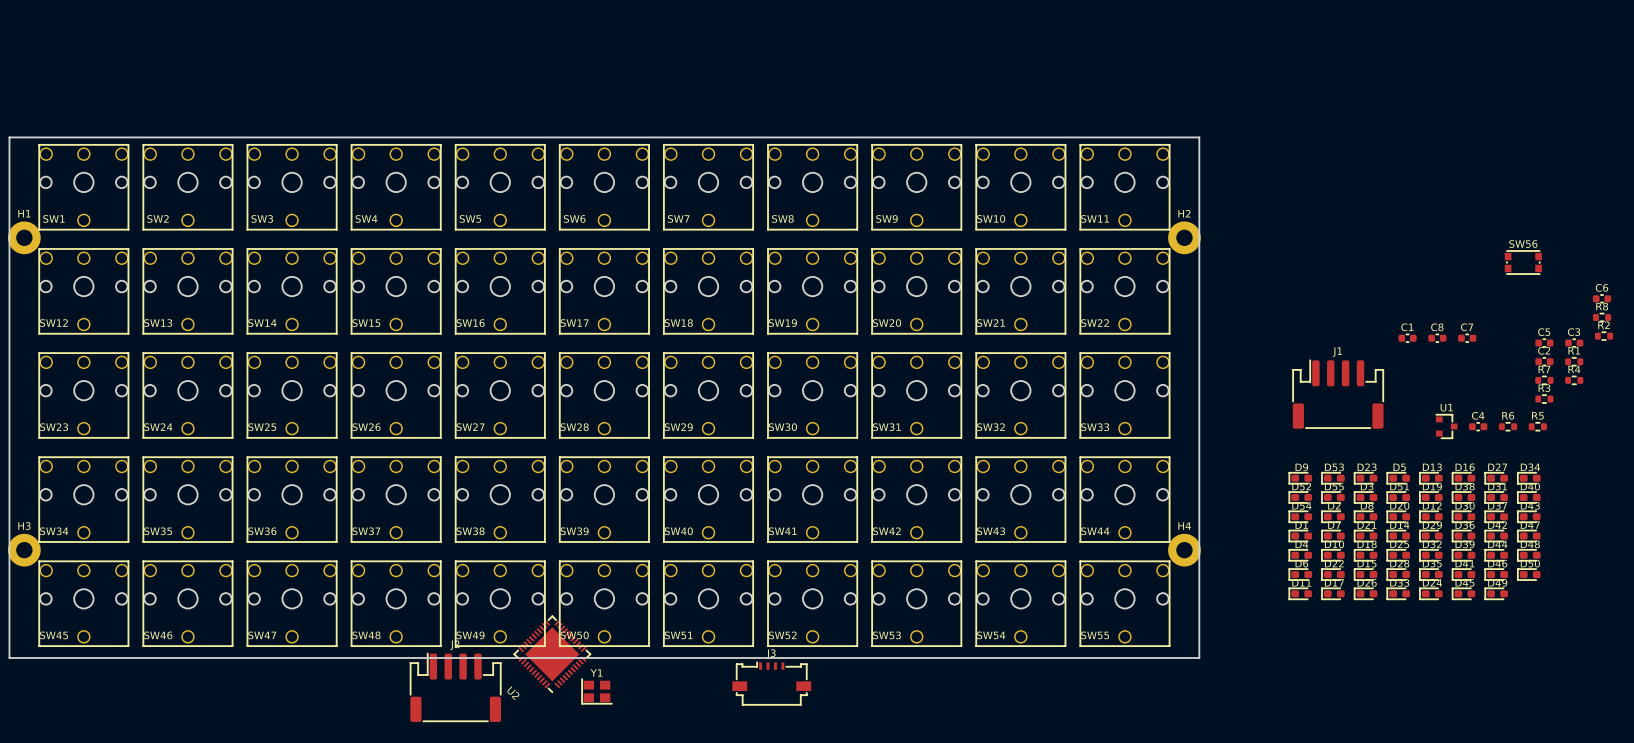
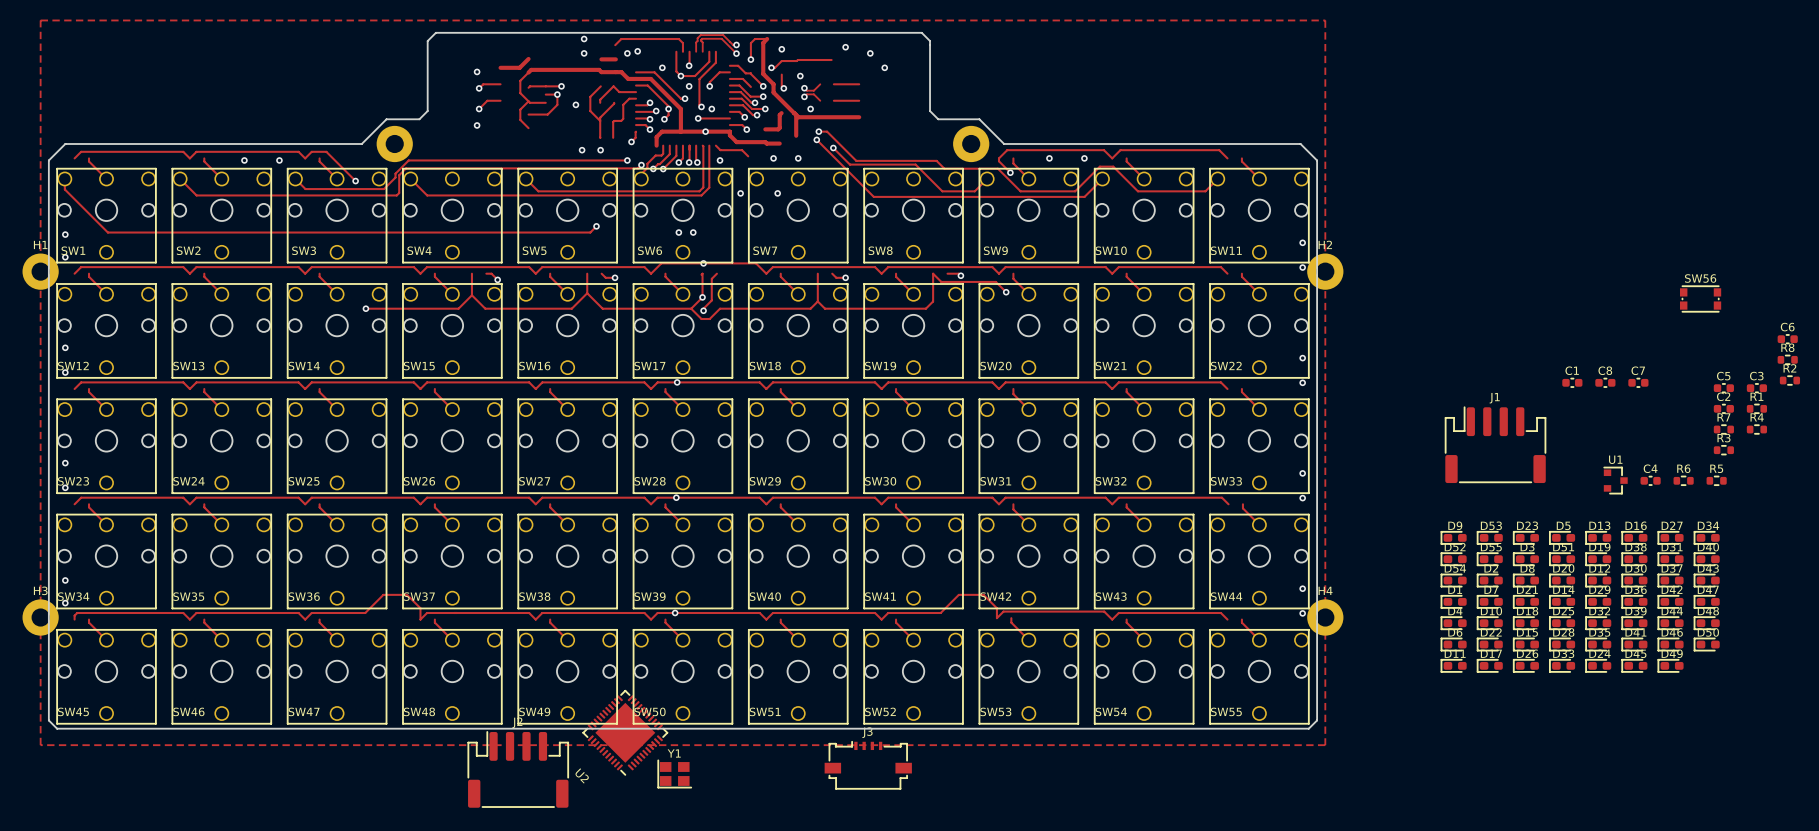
zone outline: none -> (40, 20) (40, 745) (1325, 745) (1325, 20) (40, 20)
via: none -> (584, 39)
track: none -> (615, 45) (621, 39) (678, 39) (682, 43) (682, 51)
track: none -> (736, 44) (733, 44) (723, 35) (700, 35) (696, 42) (696, 51)
via: none -> (736, 44)
via: none -> (845, 47)
via: none -> (781, 49)
via: none -> (637, 51)
track: none -> (676, 51) (676, 71) (680, 76) (694, 76) (709, 61) (709, 51)
track: none -> (689, 51) (689, 65)
track: none -> (702, 51) (702, 38) (721, 38) (736, 53)
track: none -> (715, 51) (715, 62) (699, 79) (699, 104) (701, 106)
via: none -> (584, 53)
via: none -> (627, 53)
via: none -> (736, 53)
via: none -> (870, 53)
track: none -> (528, 58) (519, 67) (500, 67)
track: none -> (601, 59) (615, 59)
track: none -> (750, 59) (750, 43) (755, 39) (767, 39) (763, 42) (763, 73) (773, 84) (773, 92) (798, 117) (859, 117)
via: none -> (750, 59)
track: none -> (831, 60) (781, 61) (775, 67) (771, 67)
via: none -> (689, 65)
track: none -> (729, 65) (738, 65) (745, 73) (750, 73) (763, 86)
via: none -> (662, 67)
via: none -> (771, 67)
via: none -> (884, 67)
via: none -> (477, 71)
track: none -> (636, 72) (654, 72) (680, 98) (685, 98)
track: none -> (729, 72) (719, 72) (709, 82) (709, 86)
track: none -> (781, 74) (781, 86) (783, 88)
via: none -> (680, 76)
via: none -> (800, 76)
track: none -> (729, 78) (742, 78) (750, 86)
track: none -> (500, 84) (483, 84) (479, 88)
track: none -> (820, 84) (813, 90) (806, 90) (804, 88)
track: none -> (833, 84) (859, 84)
track: none -> (636, 85) (647, 85) (668, 106) (668, 115) (664, 119)
track: none -> (729, 85) (739, 85) (750, 96) (763, 96)
track: none -> (561, 86) (528, 87)
via: none -> (561, 86)
track: none -> (600, 86) (590, 96) (590, 111) (600, 120)
via: none -> (689, 86)
via: none -> (709, 86)
via: none -> (763, 86)
via: none -> (479, 88)
via: none -> (783, 88)
via: none -> (804, 88)
track: none -> (636, 92) (619, 92) (613, 86) (600, 99) (600, 102)
track: none -> (729, 92) (740, 92) (751, 102) (755, 102)
track: none -> (545, 94) (557, 94) (557, 104) (547, 114) (528, 114)
via: none -> (557, 94)
via: none -> (763, 96)
track: none -> (804, 96) (806, 94) (813, 94) (820, 100)
via: none -> (804, 96)
track: none -> (636, 98) (629, 98) (623, 104) (623, 118) (613, 121) (613, 137)
via: none -> (685, 98)
track: none -> (729, 98) (741, 98) (752, 108) (765, 108)
track: none -> (500, 100) (487, 100) (479, 108)
track: none -> (833, 100) (859, 100)
track: none -> (528, 101) (520, 109) (520, 119) (528, 128)
track: none -> (545, 102) (530, 102) (520, 93) (520, 80) (531, 69) (599, 69) (601, 72) (621, 72) (628, 78) (650, 78) (680, 108) (680, 131)
track: none -> (614, 102) (600, 117) (600, 137)
track: none -> (650, 102) (647, 105) (636, 105)
via: none -> (650, 102)
via: none -> (755, 102)
via: none -> (575, 104)
track: none -> (729, 105) (743, 105) (752, 115) (757, 115)
via: none -> (701, 106)
via: none -> (479, 108)
via: none -> (668, 108)
via: none -> (711, 108)
via: none -> (765, 108)
via: none -> (810, 108)
track: none -> (656, 111) (636, 111)
via: none -> (656, 111)
track: none -> (729, 111) (739, 111) (744, 117)
track: none -> (781, 113) (779, 114) (779, 127) (765, 129)
via: none -> (757, 115)
track: none -> (796, 114) (796, 135)
via: none -> (744, 117)
track: none -> (636, 118) (650, 119)
track: none -> (698, 118) (729, 118)
via: none -> (698, 118)
via: none -> (650, 119)
via: none -> (664, 119)
via: none -> (477, 125)
track: none -> (636, 125) (645, 125) (650, 129)
track: none -> (729, 125) (742, 125) (746, 129)
via: none -> (650, 129)
via: none -> (746, 129)
track: none -> (636, 131) (635, 137) (631, 141)
via: none -> (705, 131)
track: none -> (818, 131) (827, 131) (856, 160) (936, 160) (944, 168) (997, 168) (1020, 191) (1075, 191) (1099, 166) (1113, 166) (1137, 191) (1205, 191) (1217, 178)
via: none -> (818, 131)
track: none -> (816, 139) (873, 196) (1084, 196) (1102, 178)
via: none -> (816, 139)
via: none -> (631, 141)
part: none -> (394, 143)
track: none -> (779, 143) (736, 142) (729, 135) (729, 131) (662, 131) (656, 137) (656, 145)
part: none -> (971, 143)
track: none -> (663, 145) (663, 153) (655, 155) (647, 163) (647, 167) (641, 174) (641, 178)
track: none -> (669, 145) (669, 154) (653, 168)
track: none -> (676, 145) (676, 155) (663, 169)
track: none -> (682, 145) (682, 158) (678, 162)
track: none -> (689, 145) (689, 162)
track: none -> (696, 145) (697, 162)
track: none -> (702, 145) (703, 187) (699, 191) (538, 191) (526, 178)
track: none -> (709, 145) (709, 187) (701, 195) (427, 195) (410, 178)
track: none -> (715, 145) (720, 150) (742, 150) (748, 156)
track: none -> (833, 148) (849, 164) (915, 164) (942, 191) (974, 191) (987, 178)
via: none -> (833, 148)
via: none -> (582, 150)
via: none -> (600, 150)
track: none -> (74, 158) (81, 151) (183, 151) (189, 158) (196, 151) (298, 151) (305, 158) (311, 151) (326, 151) (355, 181)
track: none -> (89, 158) (89, 161) (106, 178)
track: none -> (204, 158) (204, 161) (221, 178)
track: none -> (319, 158) (319, 161) (337, 178)
via: none -> (773, 158)
via: none -> (798, 158)
track: none -> (1013, 158) (1013, 163) (1028, 178)
via: none -> (1049, 158)
via: none -> (1084, 158)
track: none -> (1126, 158) (1126, 161) (1144, 178)
track: none -> (1227, 158) (1219, 150) (1120, 150) (1112, 158) (1103, 150) (1007, 150) (998, 158) (998, 161) (1010, 172)
track: none -> (1241, 158) (1241, 161) (1259, 178)
board edge: (9, 137) (1199, 137) (1199, 657) (9, 657) (9, 137) -> (435, 32) (427, 41) (427, 111) (419, 119) (386, 119) (361, 143) (65, 143) (48, 160) (48, 720) (57, 728) (1308, 728) (1317, 720) (1317, 160) (1300, 143) (1004, 143) (979, 119) (938, 119) (930, 111) (930, 41) (921, 32) (435, 32)
via: none -> (244, 160)
via: none -> (279, 160)
track: none -> (627, 160) (408, 160) (384, 189) (305, 189) (295, 178)
via: none -> (627, 160)
via: none -> (720, 160)
via: none -> (678, 162)
via: none -> (689, 162)
via: none -> (697, 162)
track: none -> (641, 165) (638, 168) (406, 168) (399, 175) (399, 193) (396, 195) (196, 195) (180, 178)
via: none -> (641, 165)
via: none -> (653, 168)
via: none -> (663, 169)
via: none -> (1010, 172)
track: none -> (64, 178) (64, 189) (107, 232) (590, 232) (596, 226)
via: none -> (355, 181)
via: none -> (740, 193)
via: none -> (777, 193)
via: none -> (596, 226)
via: none -> (678, 232)
via: none -> (693, 232)
via: none -> (65, 234)
via: none -> (1302, 242)
via: none -> (65, 257)
via: none -> (703, 263)
via: none -> (1302, 267)
track: none -> (74, 273) (81, 267) (183, 267) (189, 273) (196, 267) (298, 267) (305, 273) (311, 267) (413, 267) (420, 273) (427, 267) (529, 267) (535, 273) (542, 267) (644, 267) (651, 273) (661, 263) (756, 263) (766, 273) (772, 267) (875, 267) (881, 273) (888, 267) (992, 267) (998, 273) (1005, 267) (1105, 267) (1112, 273) (1118, 267) (1220, 267) (1227, 273)
track: none -> (89, 273) (89, 276) (106, 294)
track: none -> (204, 273) (204, 276) (221, 294)
track: none -> (319, 273) (319, 276) (337, 294)
track: none -> (434, 273) (434, 276) (452, 294)
track: none -> (471, 273) (471, 295)
track: none -> (486, 273) (491, 273) (497, 279)
track: none -> (550, 273) (550, 276) (567, 294)
track: none -> (587, 273) (587, 293)
track: none -> (601, 273) (605, 277) (615, 277)
track: none -> (665, 273) (665, 276) (682, 294)
track: none -> (716, 273) (711, 278) (711, 300) (703, 310)
track: none -> (780, 273) (780, 276) (798, 294)
track: none -> (817, 273) (817, 301)
track: none -> (832, 273) (836, 277) (845, 277)
track: none -> (896, 273) (896, 276) (913, 294)
track: none -> (947, 273) (958, 273) (960, 275)
track: none -> (1013, 273) (1013, 278) (1028, 294)
track: none -> (1126, 273) (1126, 276) (1144, 294)
track: none -> (1241, 273) (1241, 276) (1259, 294)
track: none -> (701, 274) (702, 297) (691, 308)
via: none -> (960, 275)
via: none -> (615, 277)
via: none -> (845, 277)
via: none -> (497, 279)
track: none -> (1006, 292) (995, 281) (941, 281) (933, 273) (933, 301) (925, 308) (825, 308) (817, 301)
via: none -> (1006, 292)
track: none -> (587, 293) (602, 308) (691, 308)
track: none -> (587, 293) (571, 308) (485, 308) (471, 295)
track: none -> (471, 295) (458, 308) (365, 308)
via: none -> (702, 297)
track: none -> (817, 301) (810, 308) (720, 308) (709, 318) (701, 318) (691, 308)
via: none -> (365, 308)
via: none -> (703, 310)
via: none -> (65, 347)
via: none -> (1302, 358)
via: none -> (65, 372)
via: none -> (677, 382)
via: none -> (1302, 382)
track: none -> (74, 388) (81, 382) (183, 382) (189, 388) (196, 382) (298, 382) (305, 388) (311, 382) (413, 382) (420, 388) (427, 382) (529, 382) (535, 388) (542, 382) (644, 382) (651, 388) (657, 382) (759, 382) (766, 388) (772, 382) (875, 382) (881, 388) (888, 382) (992, 382) (998, 388) (1005, 382) (1105, 382) (1112, 388) (1118, 382) (1220, 382) (1227, 388)
track: none -> (89, 388) (89, 392) (106, 409)
track: none -> (204, 388) (204, 392) (221, 409)
track: none -> (319, 388) (319, 392) (337, 409)
track: none -> (434, 388) (434, 392) (452, 409)
track: none -> (550, 388) (550, 392) (567, 409)
track: none -> (665, 388) (665, 392) (682, 409)
track: none -> (780, 388) (780, 392) (798, 409)
track: none -> (896, 388) (896, 392) (913, 409)
track: none -> (1013, 388) (1013, 394) (1028, 409)
track: none -> (1126, 388) (1126, 392) (1144, 409)
track: none -> (1241, 388) (1241, 392) (1259, 409)
via: none -> (65, 463)
via: none -> (1302, 473)
via: none -> (65, 487)
via: none -> (676, 497)
via: none -> (1302, 498)
track: none -> (74, 504) (81, 497) (183, 497) (189, 504) (196, 497) (298, 497) (305, 504) (311, 497) (413, 497) (420, 504) (427, 497) (529, 497) (535, 504) (542, 497) (644, 497) (651, 504) (657, 497) (759, 497) (766, 504) (772, 497) (875, 497) (881, 504) (888, 497) (992, 497) (998, 504) (1005, 497) (1105, 497) (1112, 504) (1118, 497) (1221, 497) (1228, 504)
track: none -> (89, 504) (89, 507) (106, 524)
track: none -> (204, 504) (204, 507) (221, 524)
track: none -> (319, 504) (319, 507) (337, 524)
track: none -> (434, 504) (434, 507) (452, 524)
track: none -> (550, 504) (550, 507) (567, 524)
track: none -> (665, 504) (665, 507) (682, 524)
track: none -> (780, 504) (780, 507) (798, 524)
track: none -> (896, 504) (896, 507) (913, 524)
track: none -> (1013, 504) (1013, 509) (1028, 524)
track: none -> (1126, 504) (1126, 507) (1144, 524)
track: none -> (1242, 504) (1242, 508) (1259, 524)
via: none -> (65, 580)
via: none -> (1302, 588)
via: none -> (65, 603)
via: none -> (675, 612)
via: none -> (1302, 613)
track: none -> (1011, 618) (1011, 622) (1028, 640)
track: none -> (74, 619) (77, 612) (183, 612) (189, 619) (196, 612) (298, 612) (305, 619) (311, 612) (365, 612) (383, 594) (407, 594) (420, 608) (420, 619) (427, 612) (529, 612) (535, 619) (542, 612) (644, 612) (651, 619) (657, 612) (759, 612) (766, 619) (772, 612) (875, 612) (881, 619) (888, 612) (940, 612) (958, 594) (983, 594) (996, 608) (996, 618) (1003, 611) (1104, 611) (1112, 619) (1118, 612) (1220, 612) (1227, 619)
track: none -> (89, 619) (89, 622) (106, 640)
track: none -> (204, 619) (204, 622) (221, 640)
track: none -> (319, 619) (319, 622) (337, 640)
track: none -> (434, 619) (434, 622) (452, 640)
track: none -> (550, 619) (550, 622) (567, 640)
track: none -> (665, 619) (665, 622) (682, 640)
track: none -> (780, 619) (780, 622) (798, 640)
track: none -> (896, 619) (896, 622) (913, 640)
track: none -> (1126, 619) (1126, 622) (1144, 640)
track: none -> (1241, 619) (1241, 622) (1259, 640)

